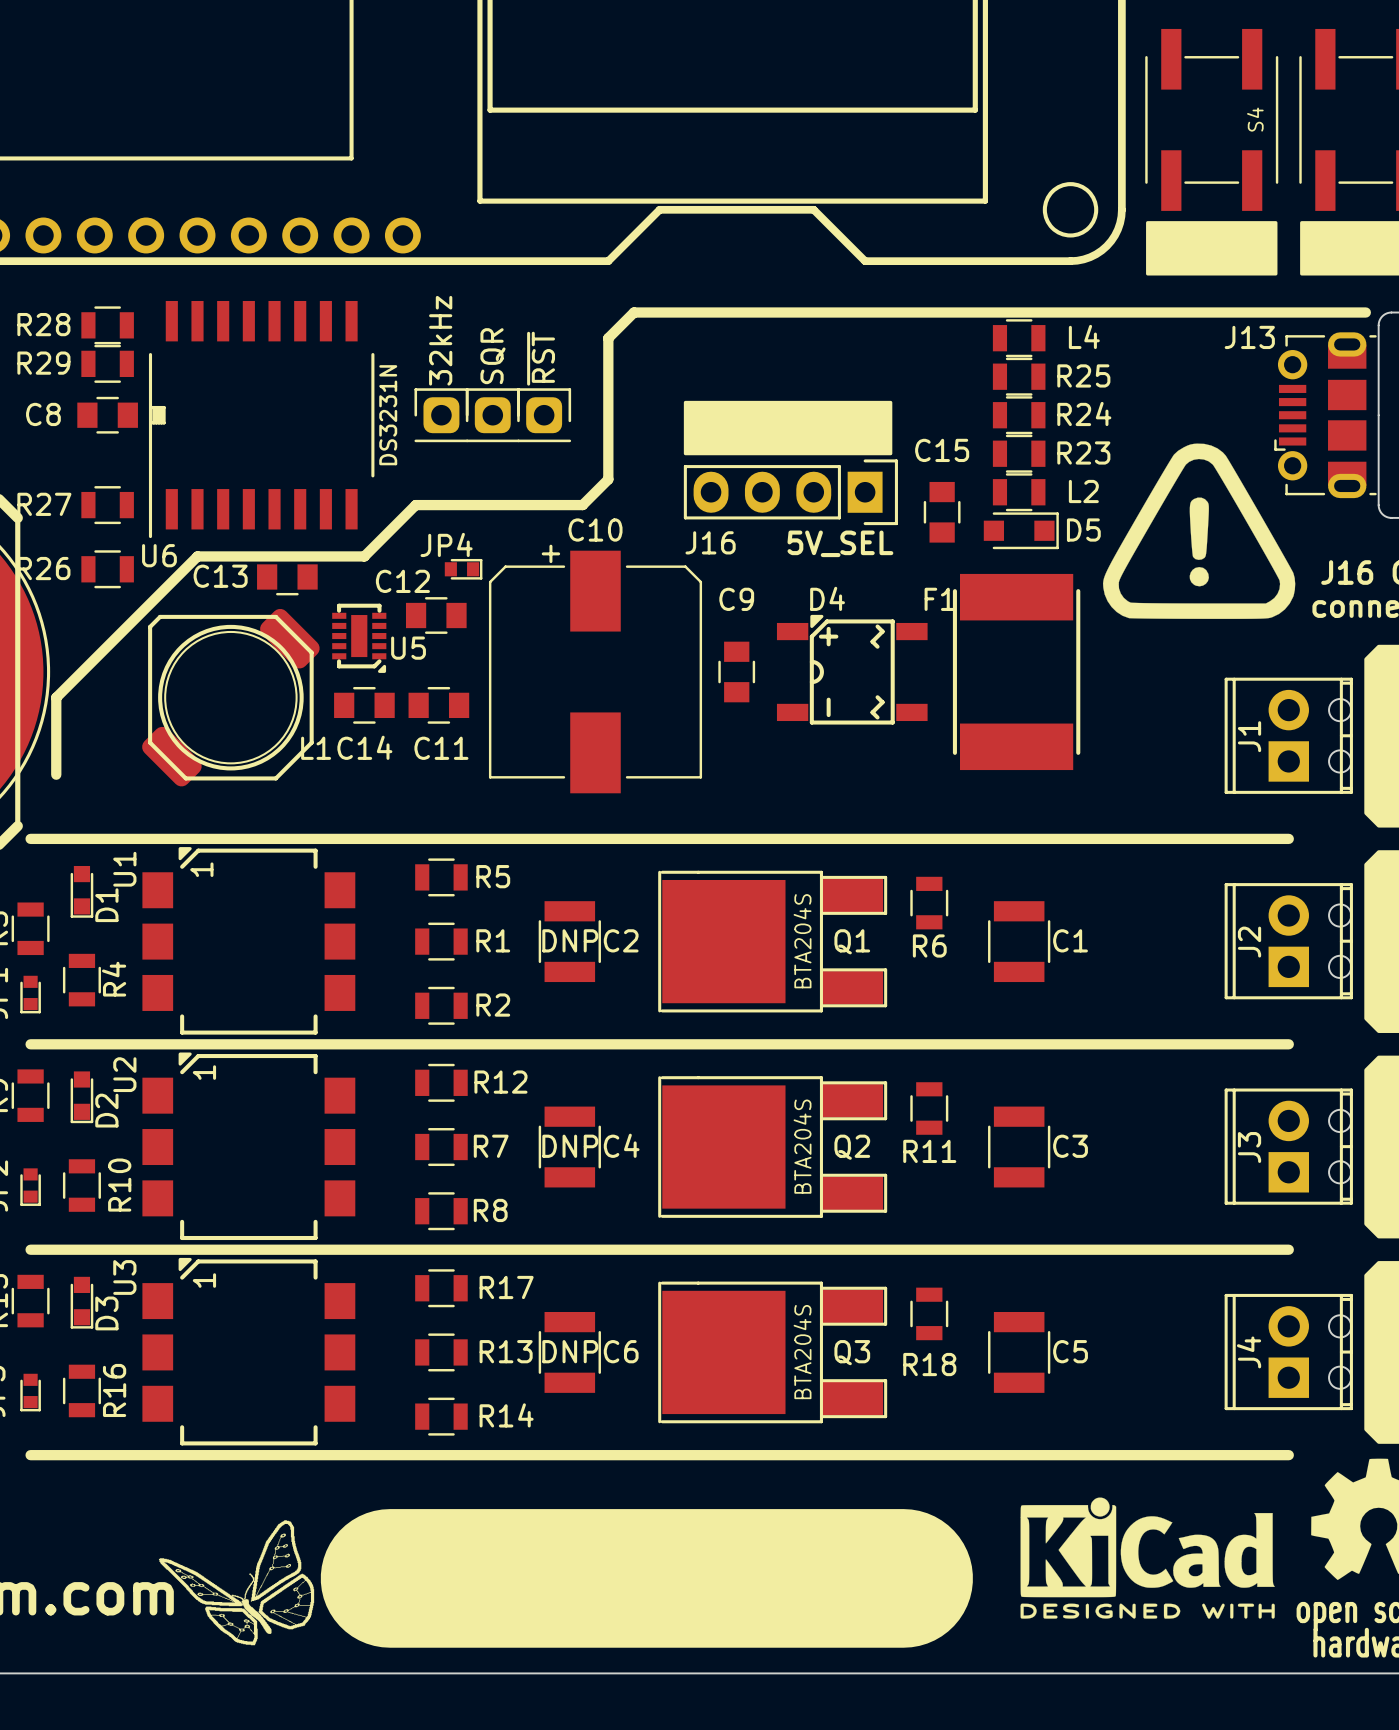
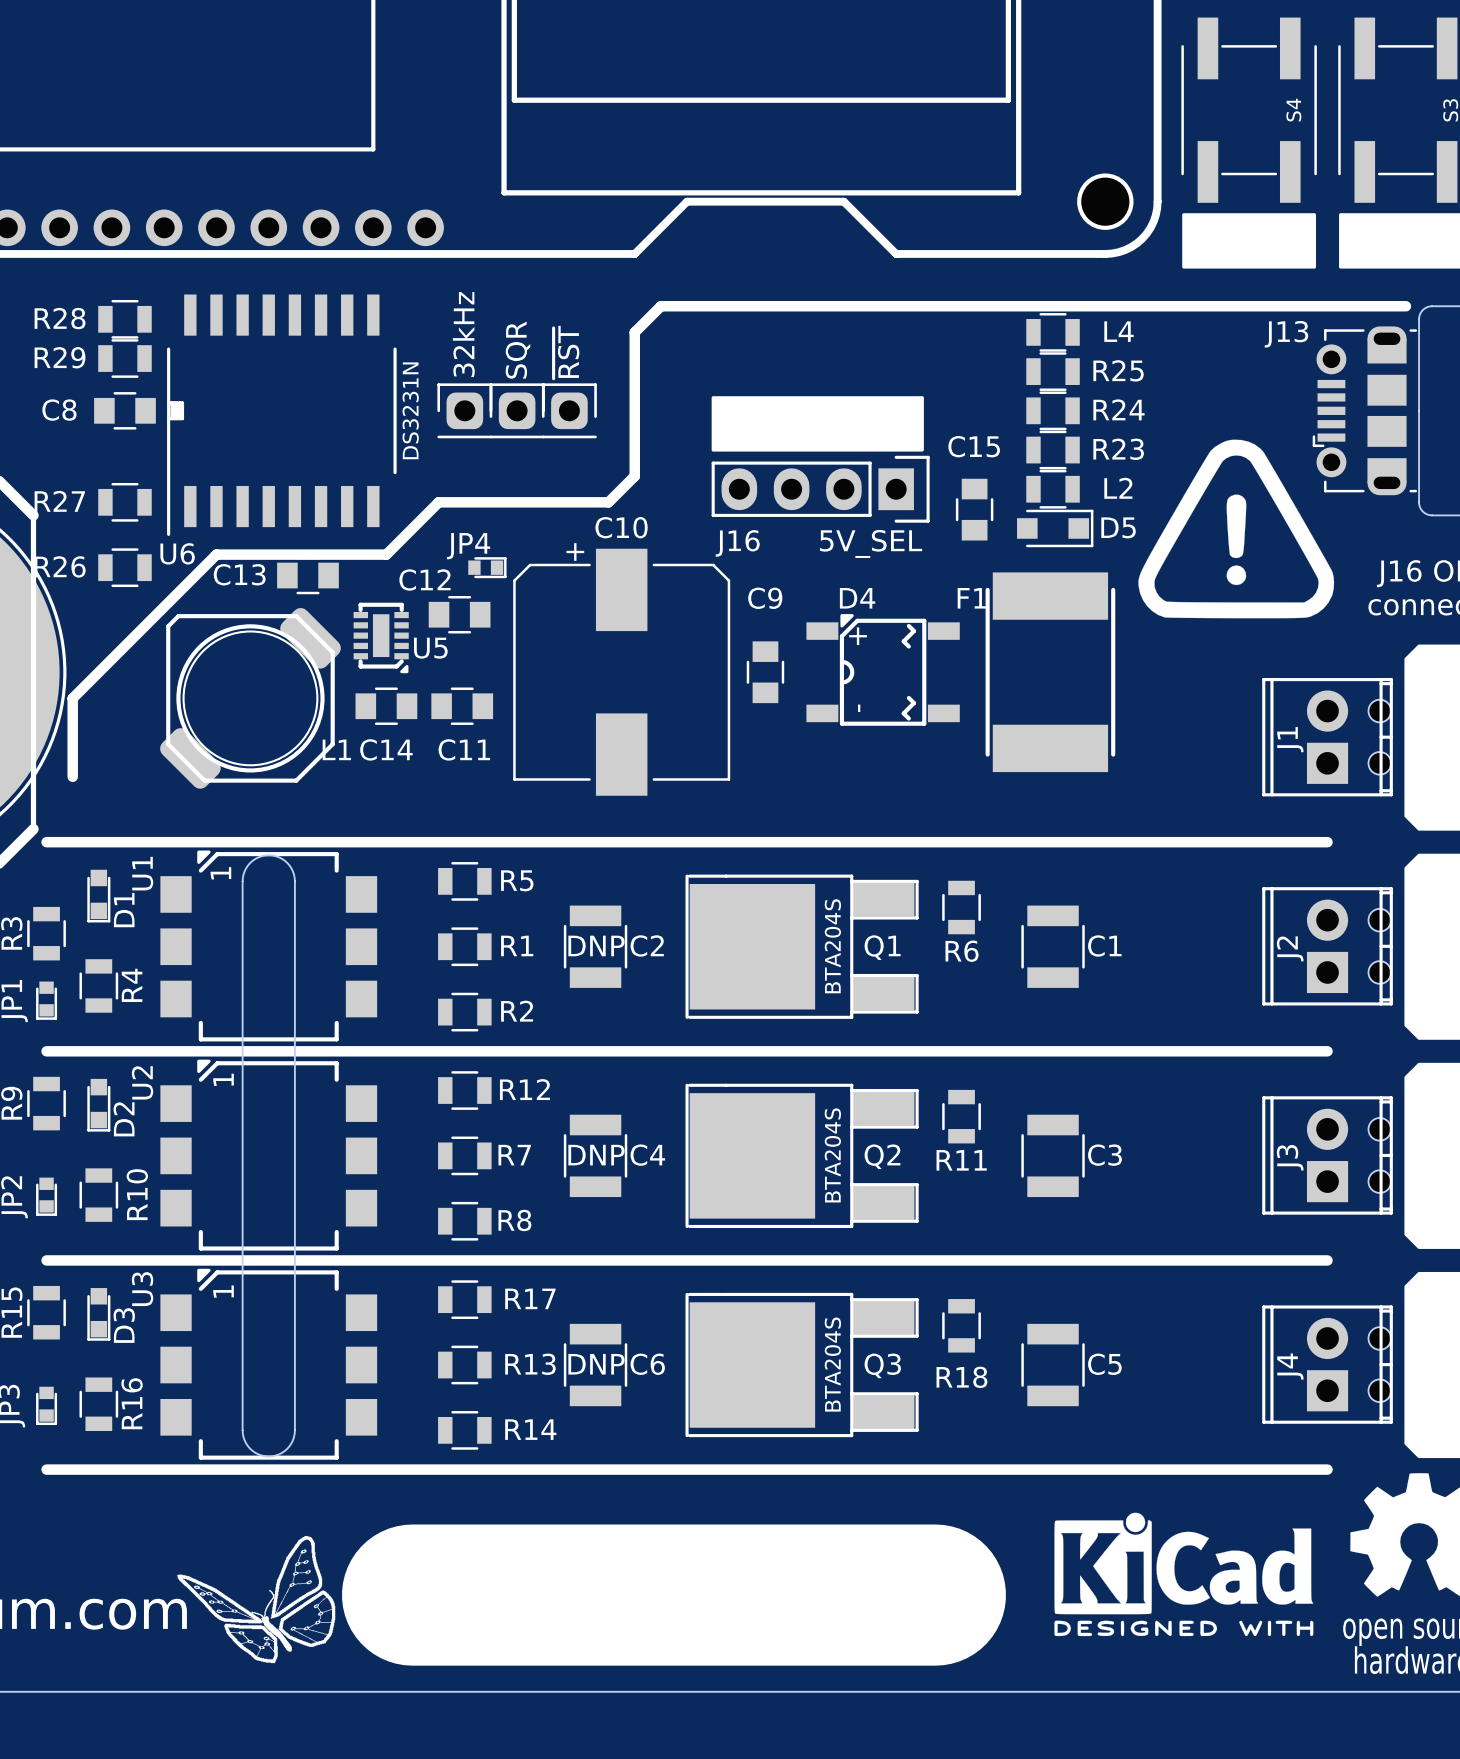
board edge: none -> (242, 881) (244, 871) (250, 862) (258, 857) (268, 855) (284, 860) (291, 868) (294, 877) (294, 1430)
board edge: none -> (242, 881) (242, 1433) (246, 1443) (252, 1451) (262, 1455) (272, 1456) (281, 1453) (289, 1446) (294, 1430)

